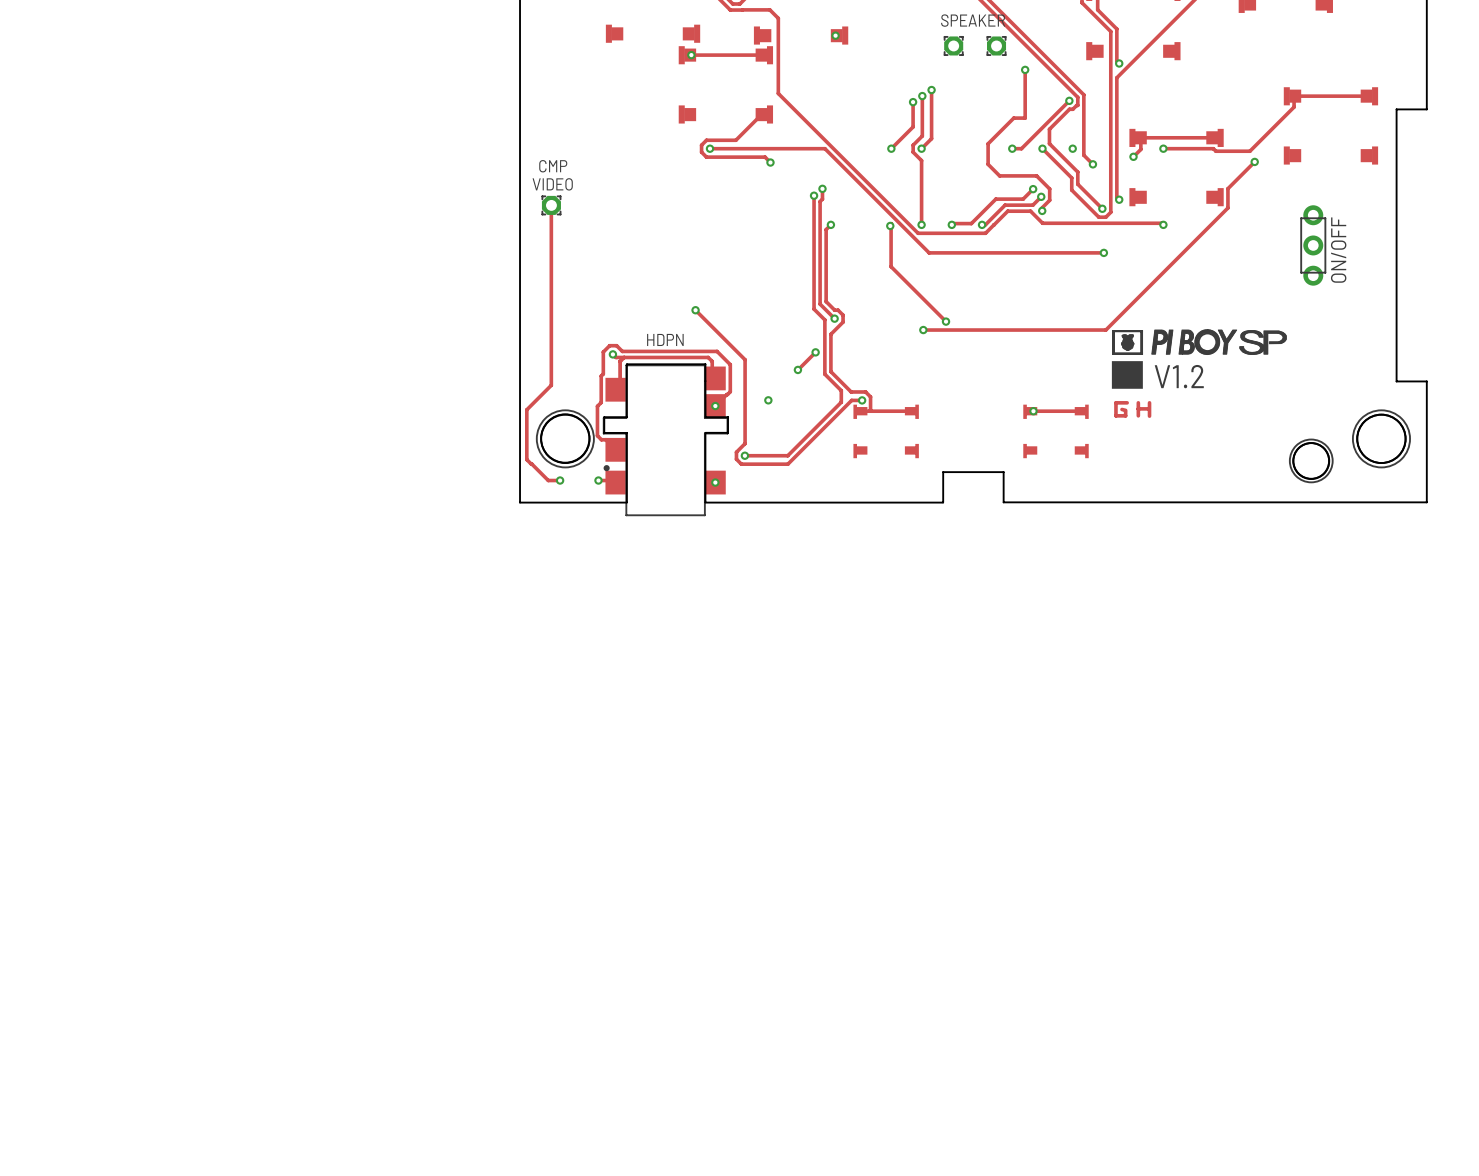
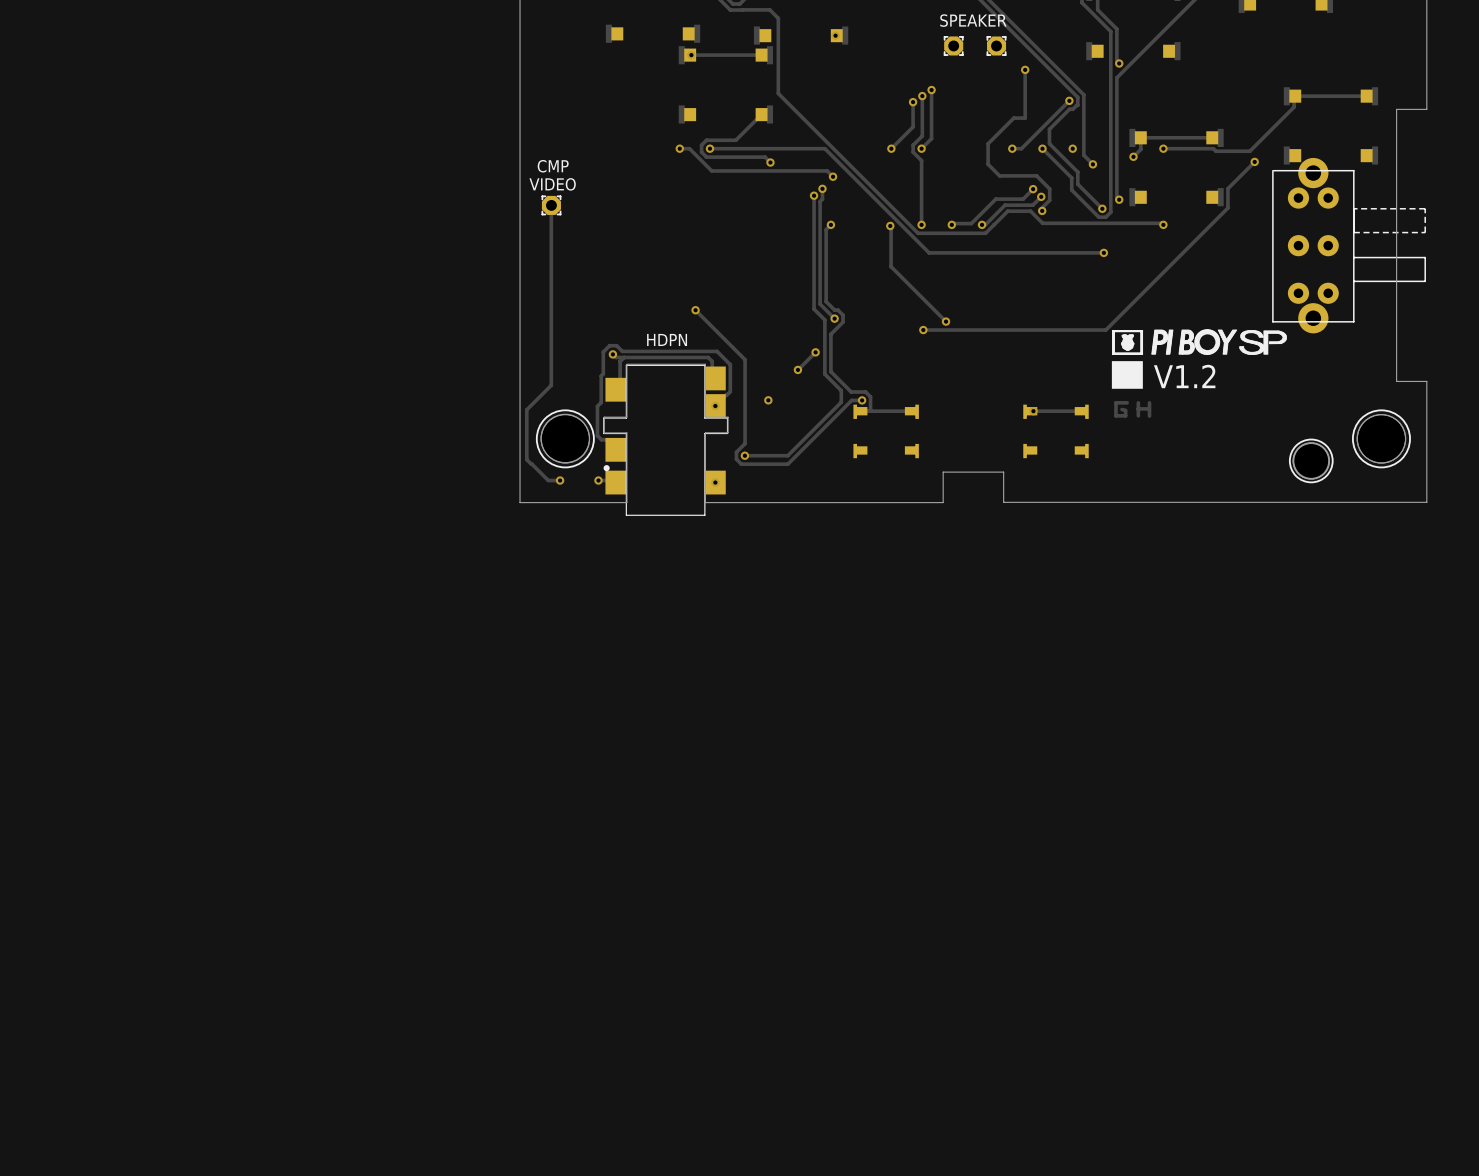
track: none -> (679, 148) (689, 148) (711, 170) (827, 170) (833, 176)
via: none -> (679, 148)
via: none -> (833, 176)
ON/OFF: (1313, 245) -> none
part: none -> (1349, 245)

